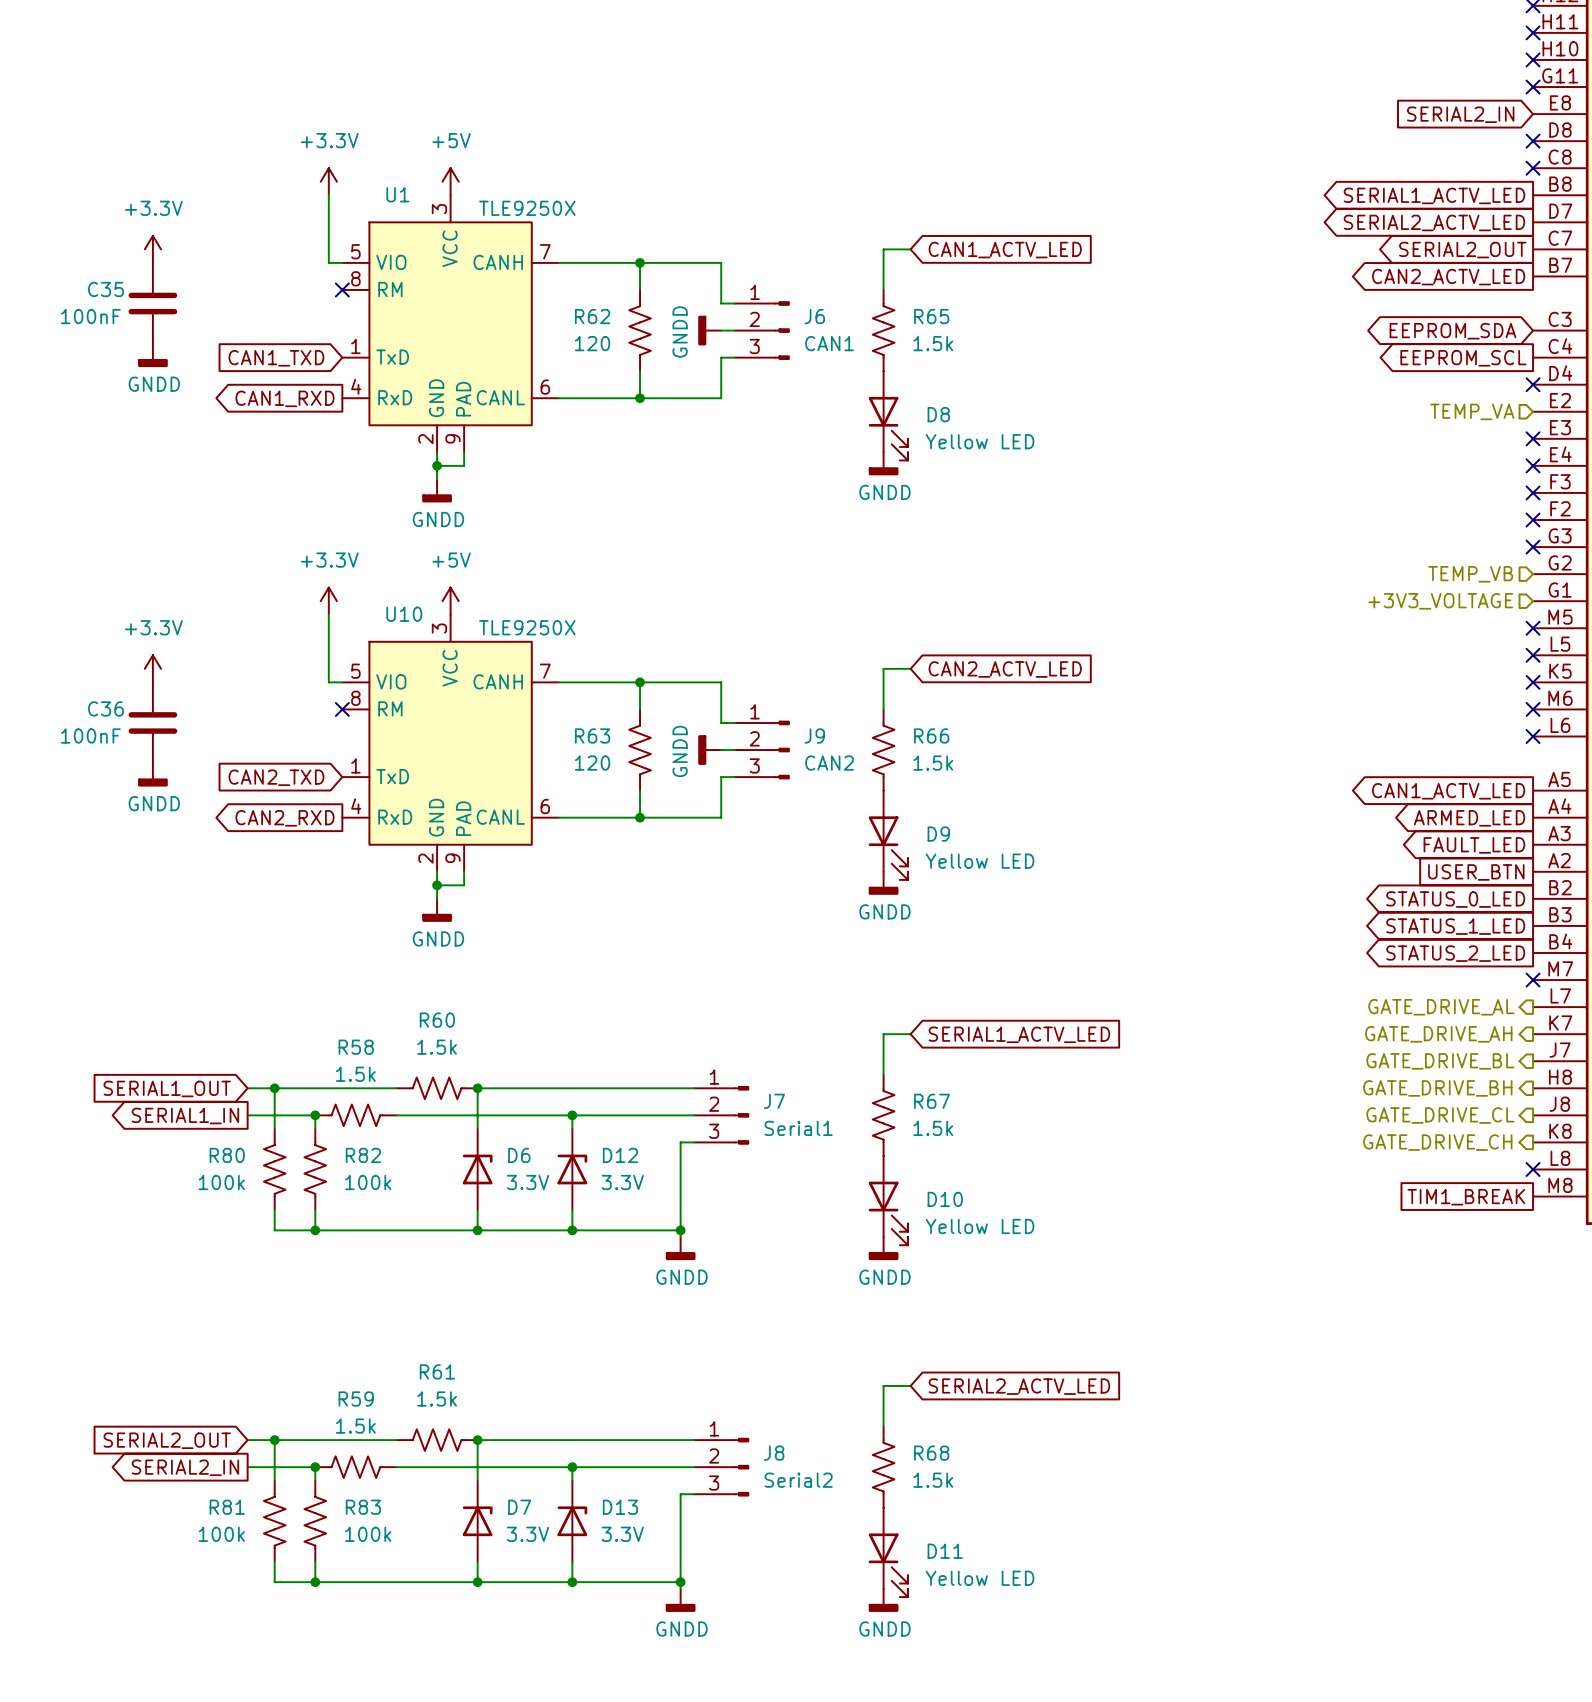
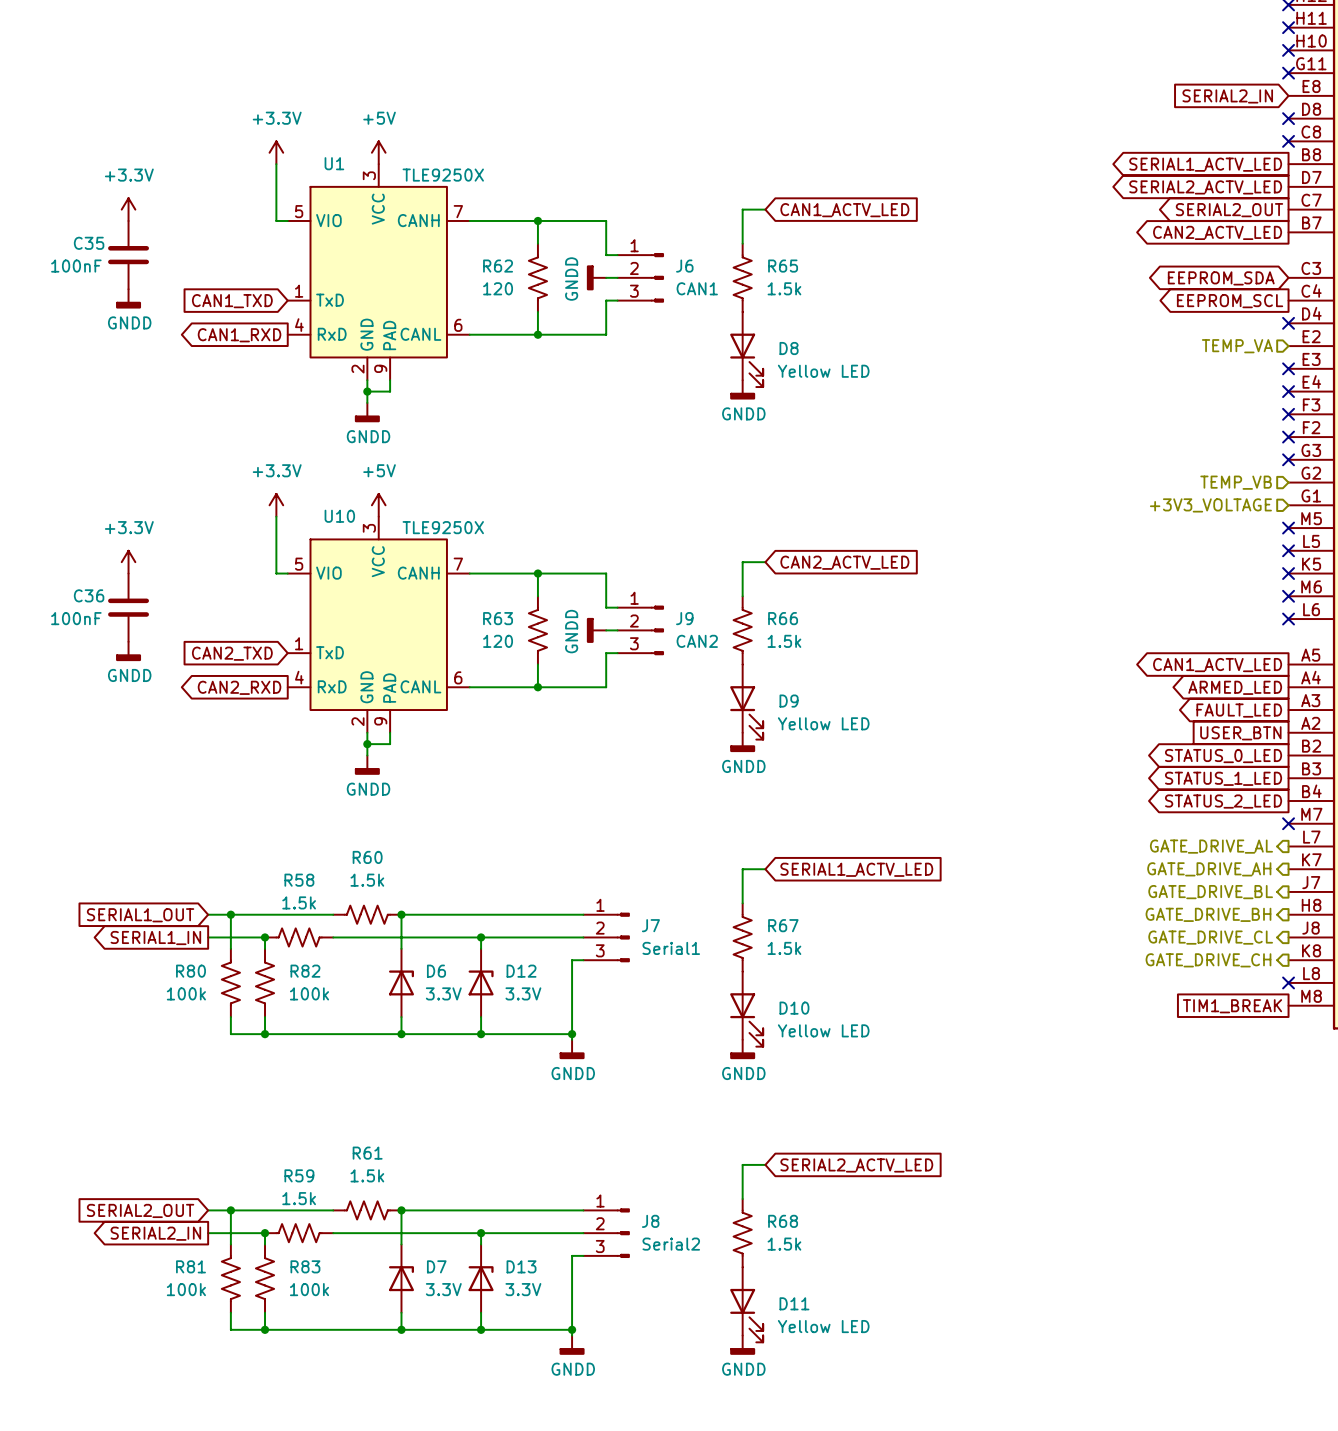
U1 symbol: [342, 195, 559, 453] -> [287, 164, 470, 381]
no-connect mark: (342, 289) -> none
U10 symbol: [342, 614, 559, 872] -> [287, 516, 470, 733]
no-connect mark: (342, 709) -> none

